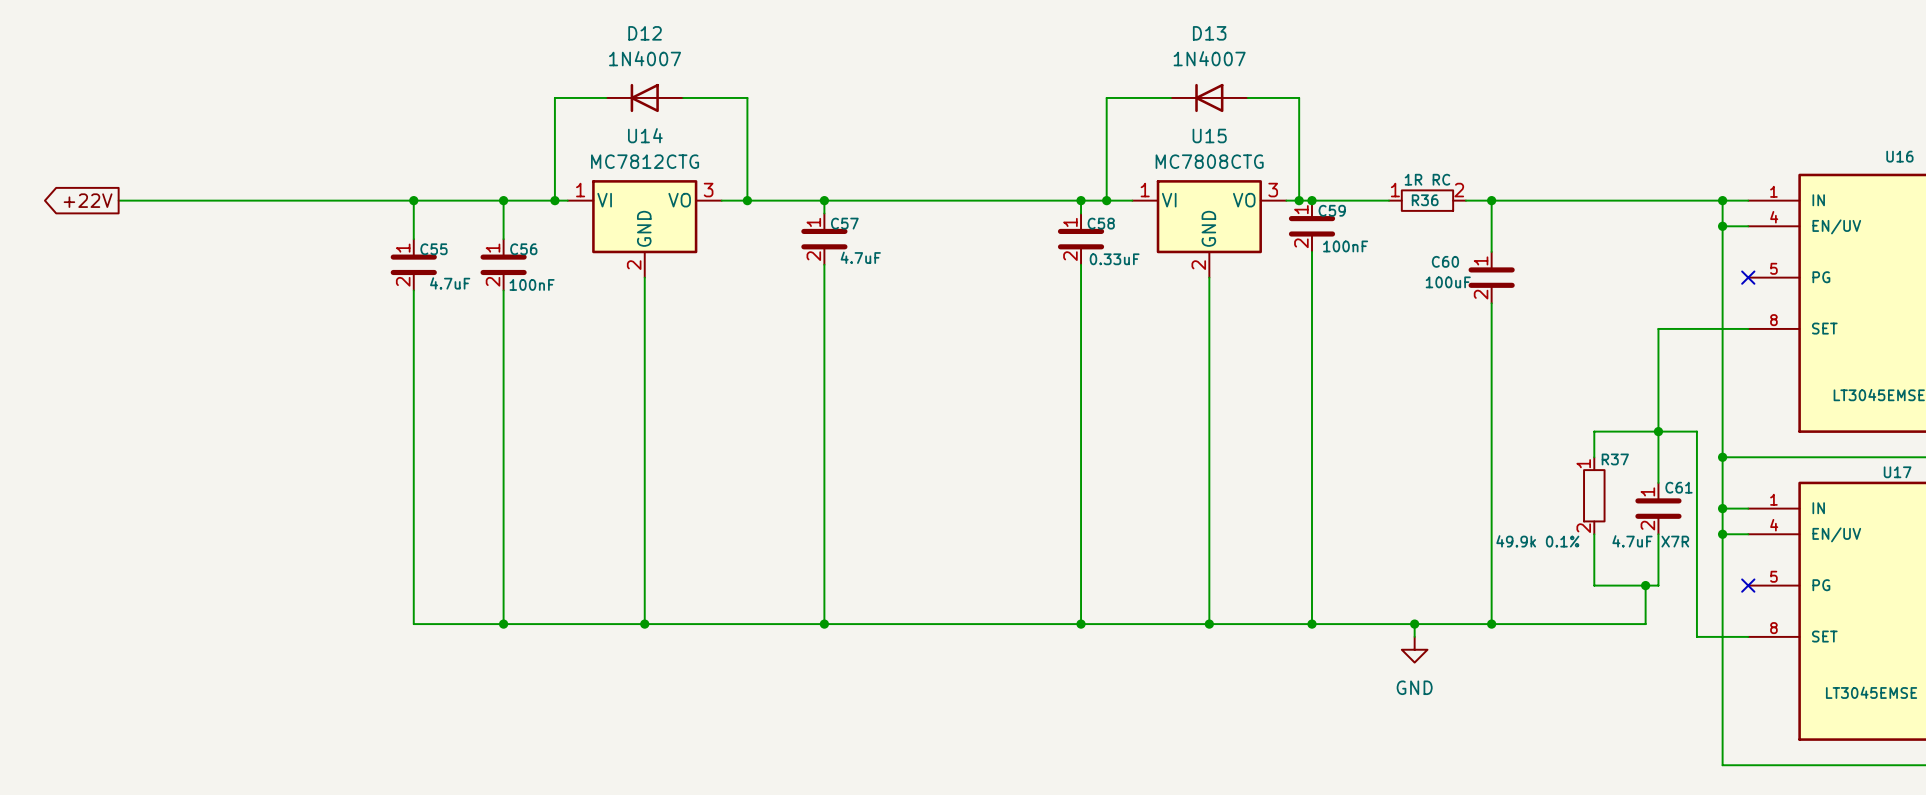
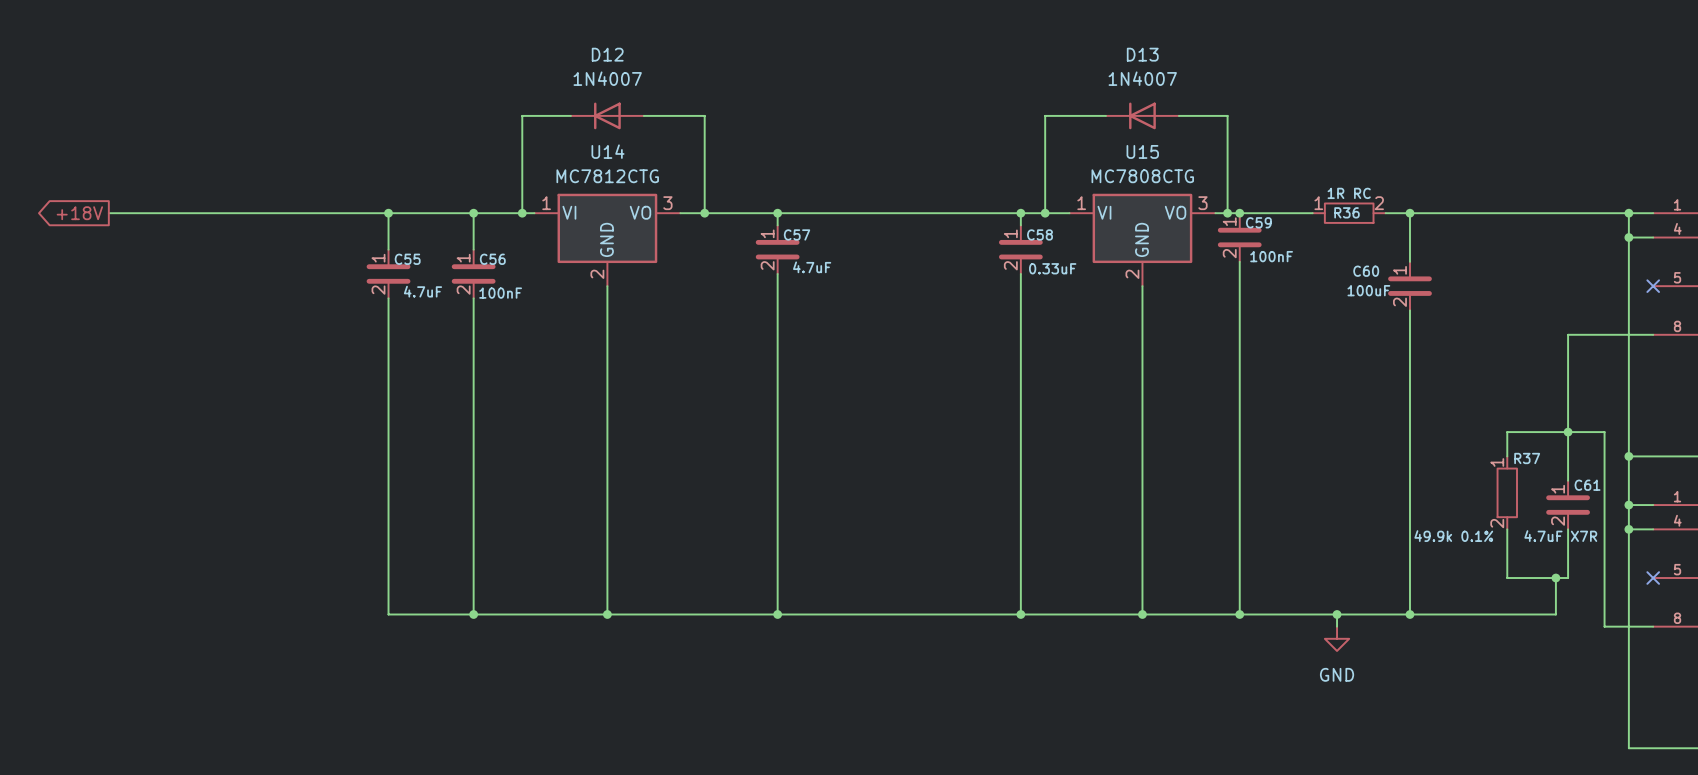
global label: +22V (88, 200) -> +18V (79, 213)

